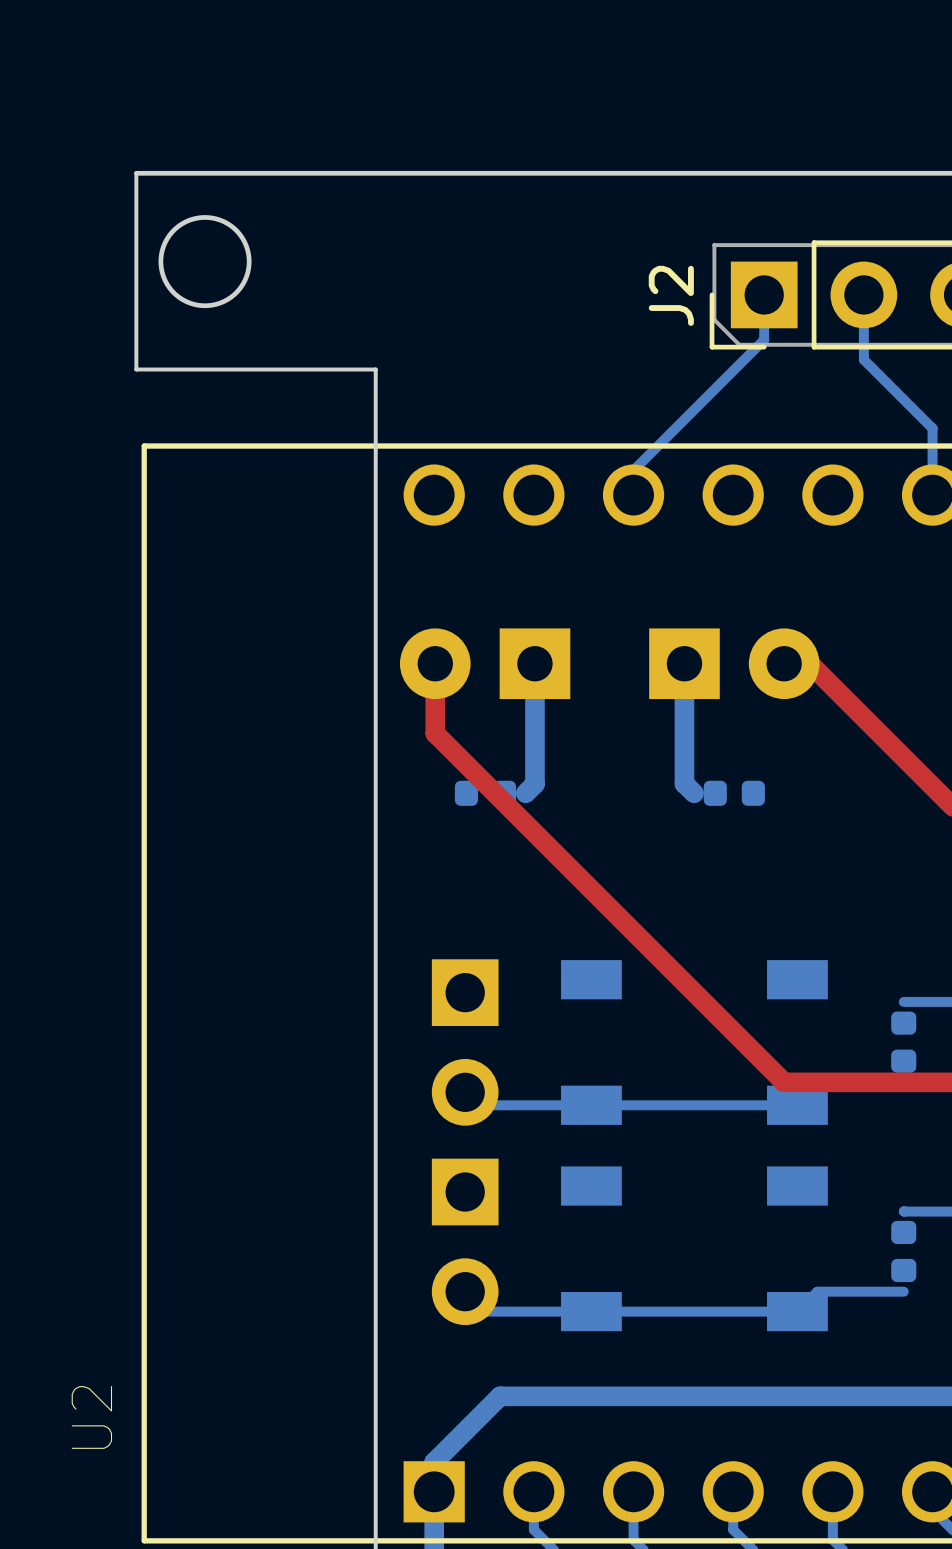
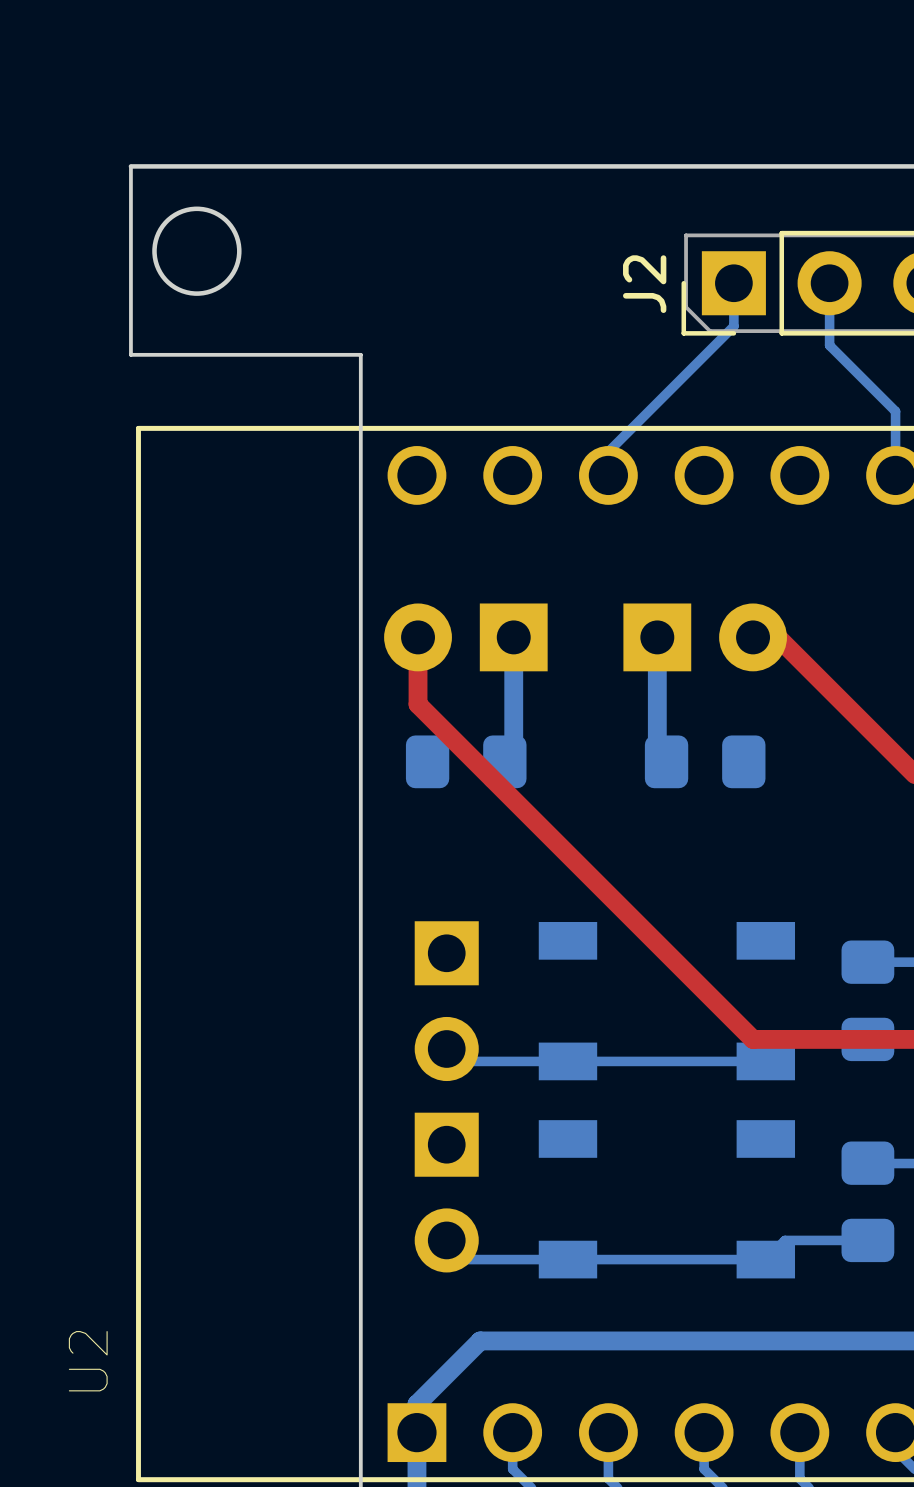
part footprint: [454, 780, 517, 806] -> [405, 735, 527, 789]
part footprint: [703, 780, 765, 806] -> [644, 735, 766, 789]
part footprint: [891, 1011, 917, 1073] -> [841, 940, 895, 1062]
part footprint: [891, 1220, 917, 1283] -> [841, 1141, 895, 1263]

